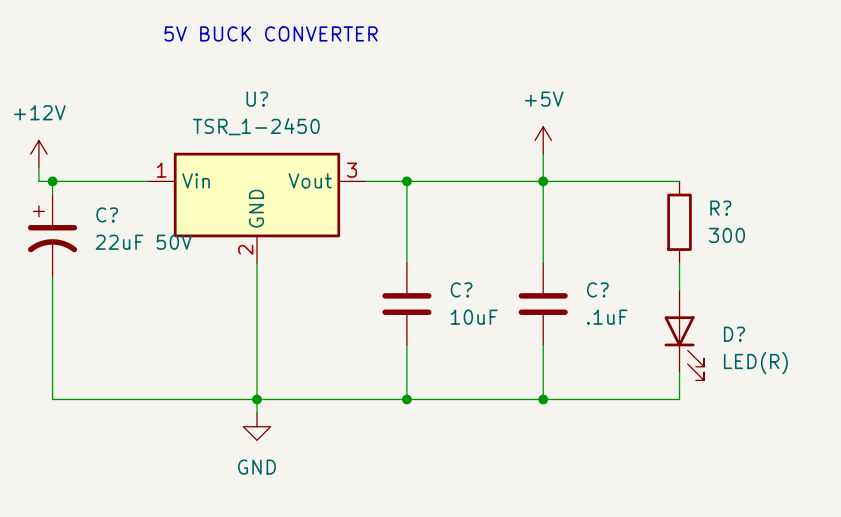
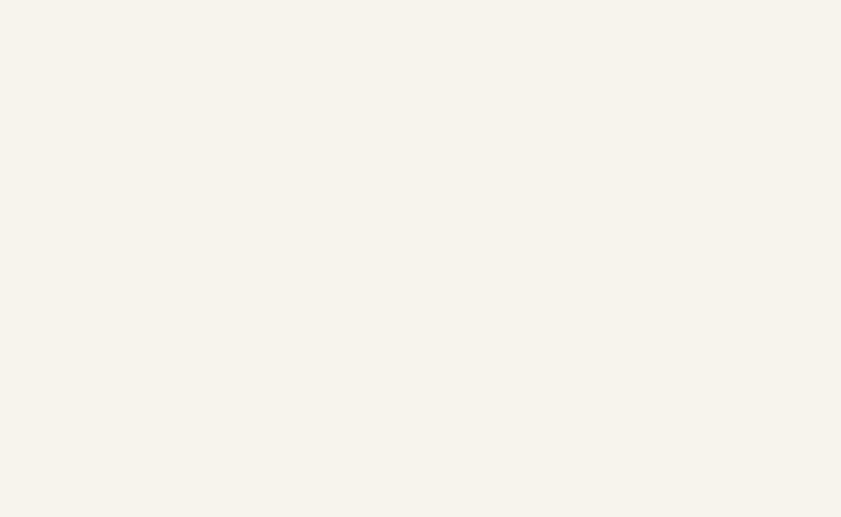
text: 5V BUCK CONVERTER (271, 33) -> none
power symbol: +5V (543, 140) -> none
power symbol: +12V (38, 154) -> none
wire: (543, 154) (543, 263) -> none
wire: (38, 167) (38, 181) (147, 181) -> none
wire: (52, 181) (52, 195) -> none
junction: (52, 181) -> none
wire: (366, 181) (679, 181) -> none
wire: (406, 181) (406, 263) -> none
junction: (406, 181) -> none
junction: (543, 181) -> none
U?: TSR_1-2450 (257, 207) -> none
R?: 300 (679, 222) -> none
C?: 22uF 50V (52, 235) -> none
wire: (257, 263) (257, 413) -> none
wire: (679, 263) (679, 290) -> none
wire: (52, 276) (52, 399) (679, 399) (679, 372) -> none
C?: 10uF (406, 304) -> none
C?: .1uF (543, 304) -> none
D?: LED(R) (684, 335) -> none
wire: (406, 344) (406, 399) -> none
wire: (543, 344) (543, 399) -> none
junction: (257, 399) -> none
junction: (406, 399) -> none
junction: (543, 399) -> none
power symbol: GND (257, 426) -> none

